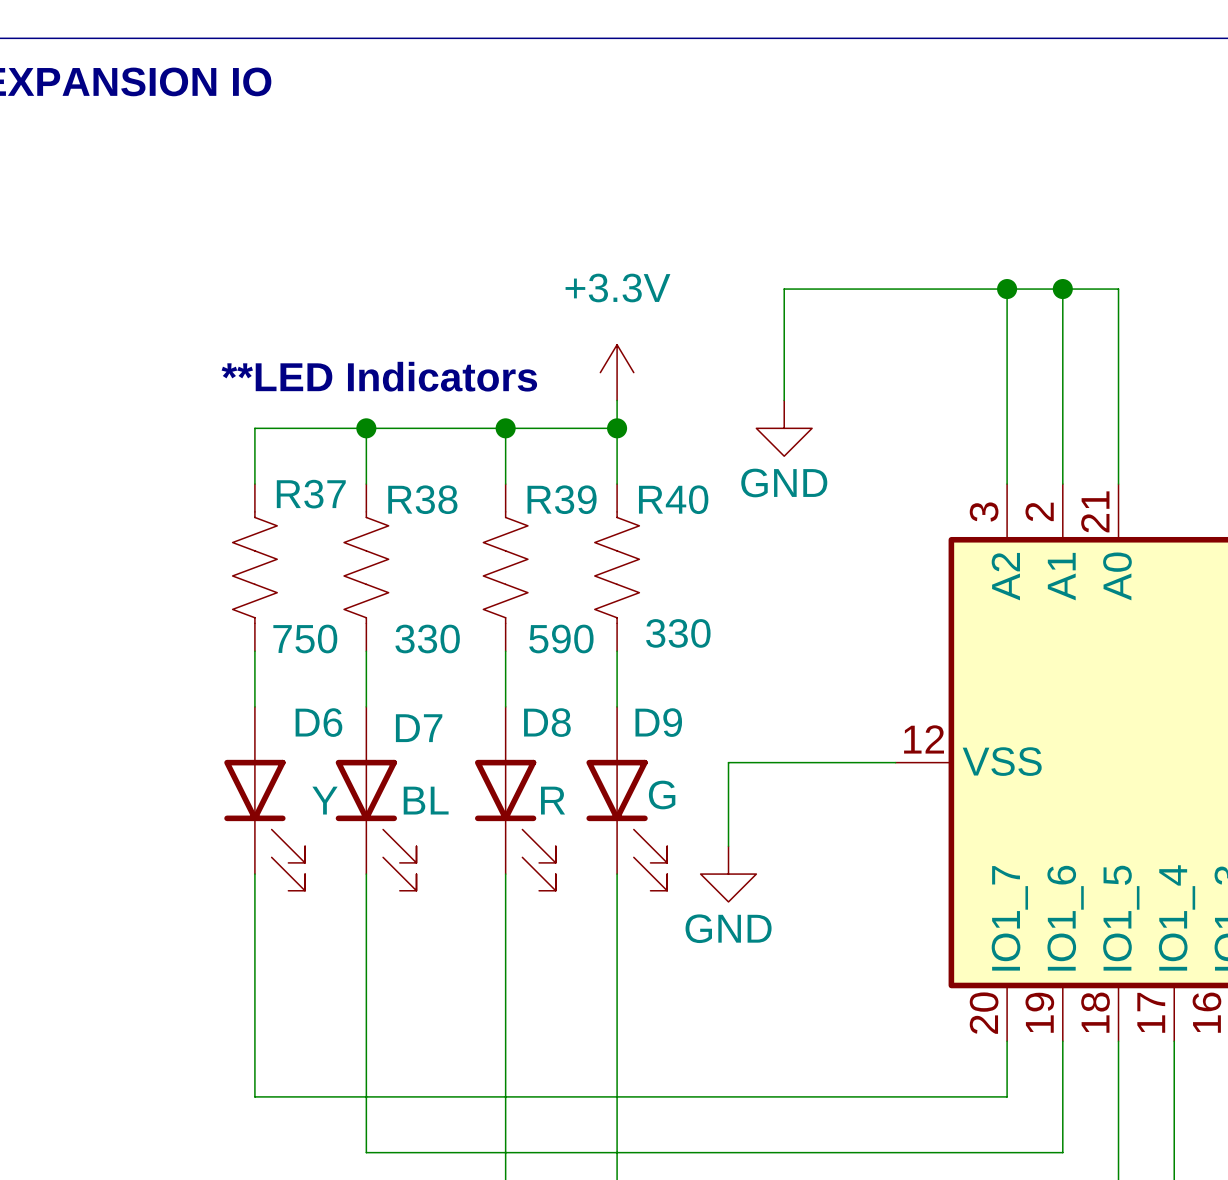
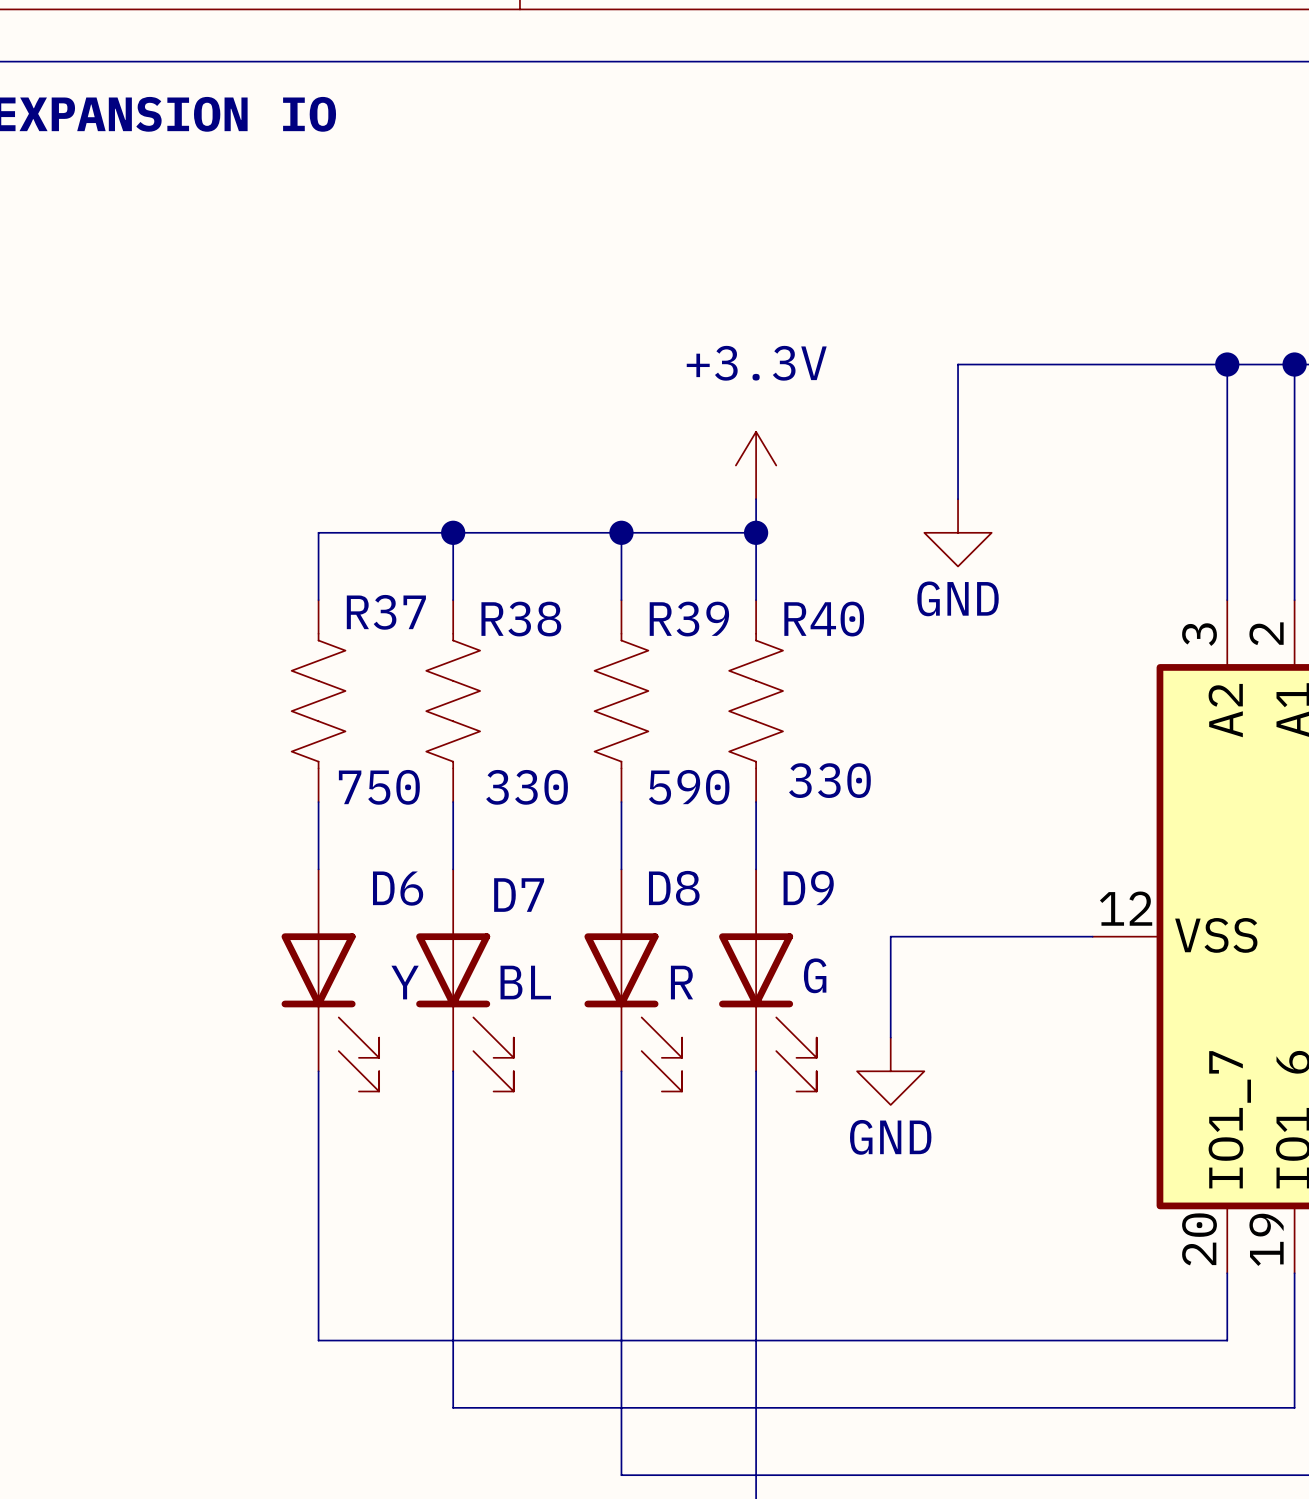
text: **LED Indicators (379, 376) -> none

